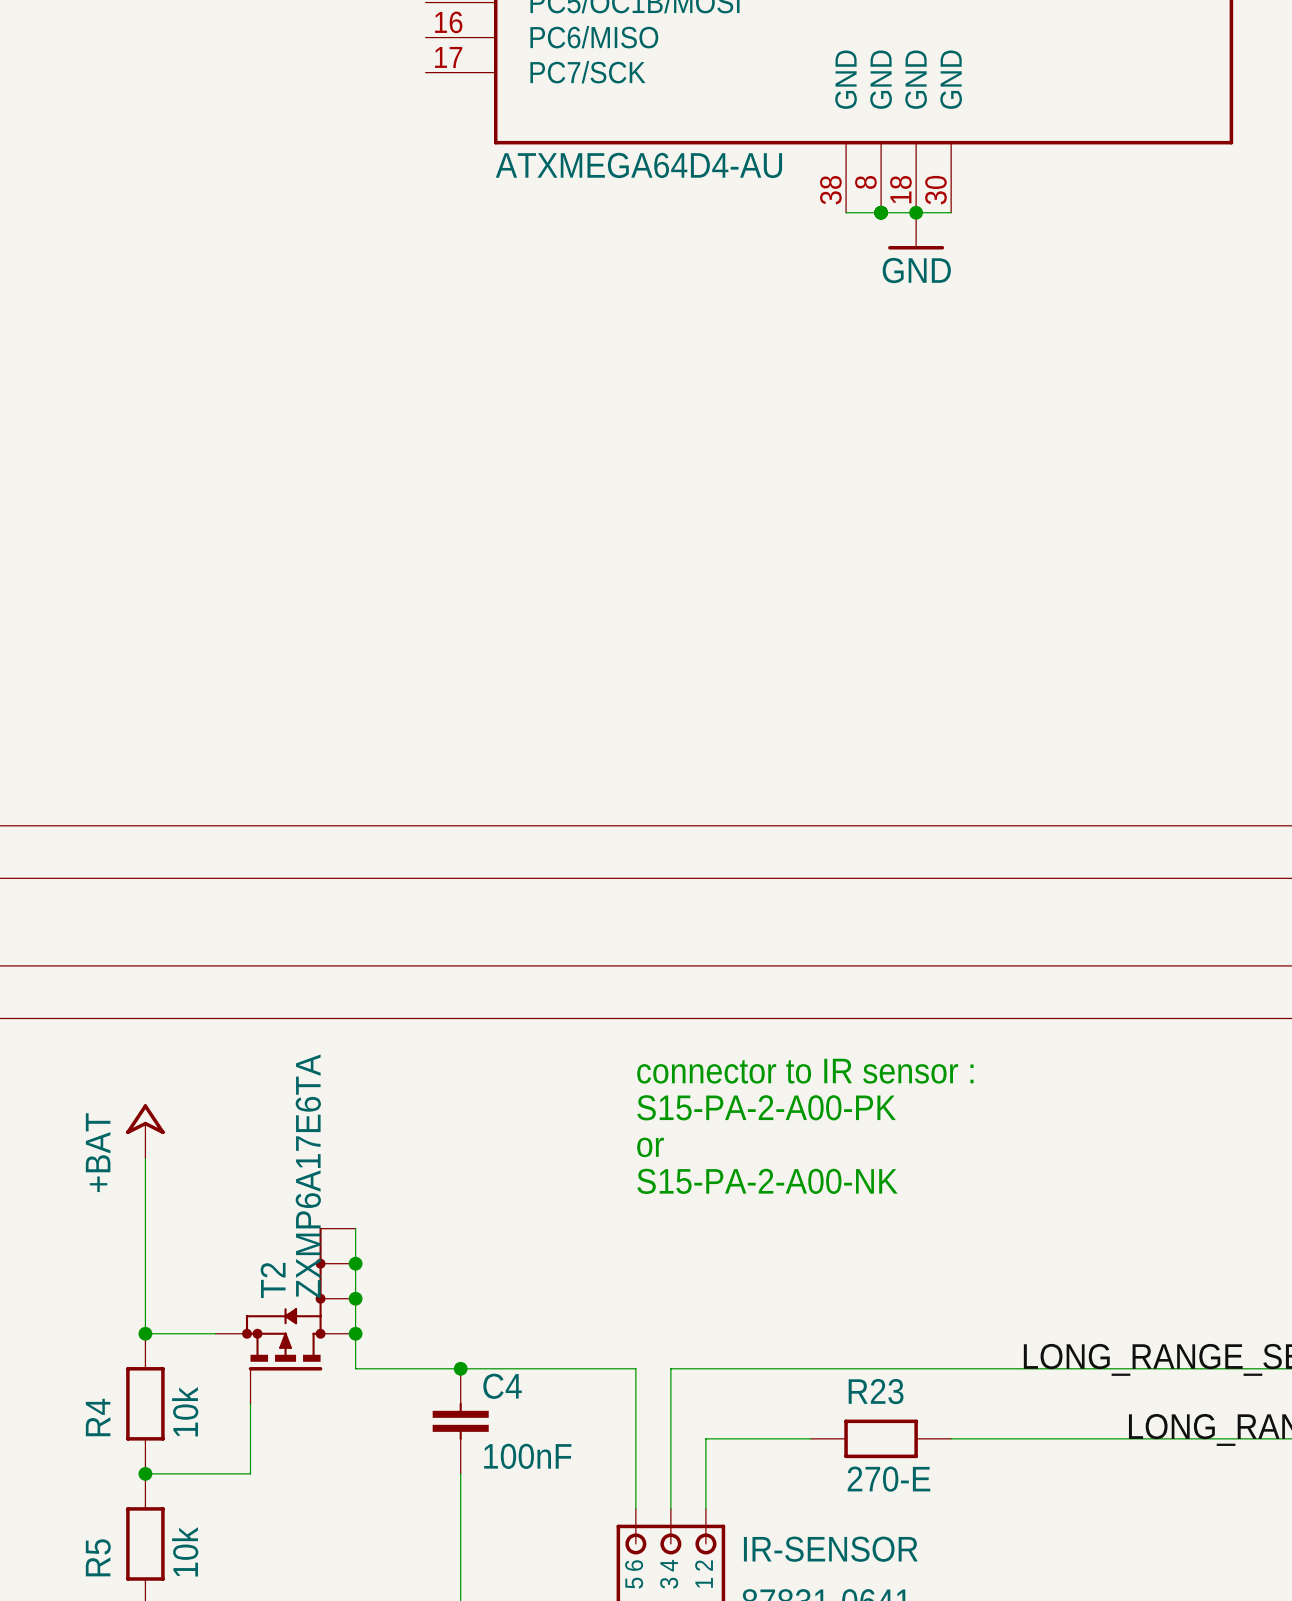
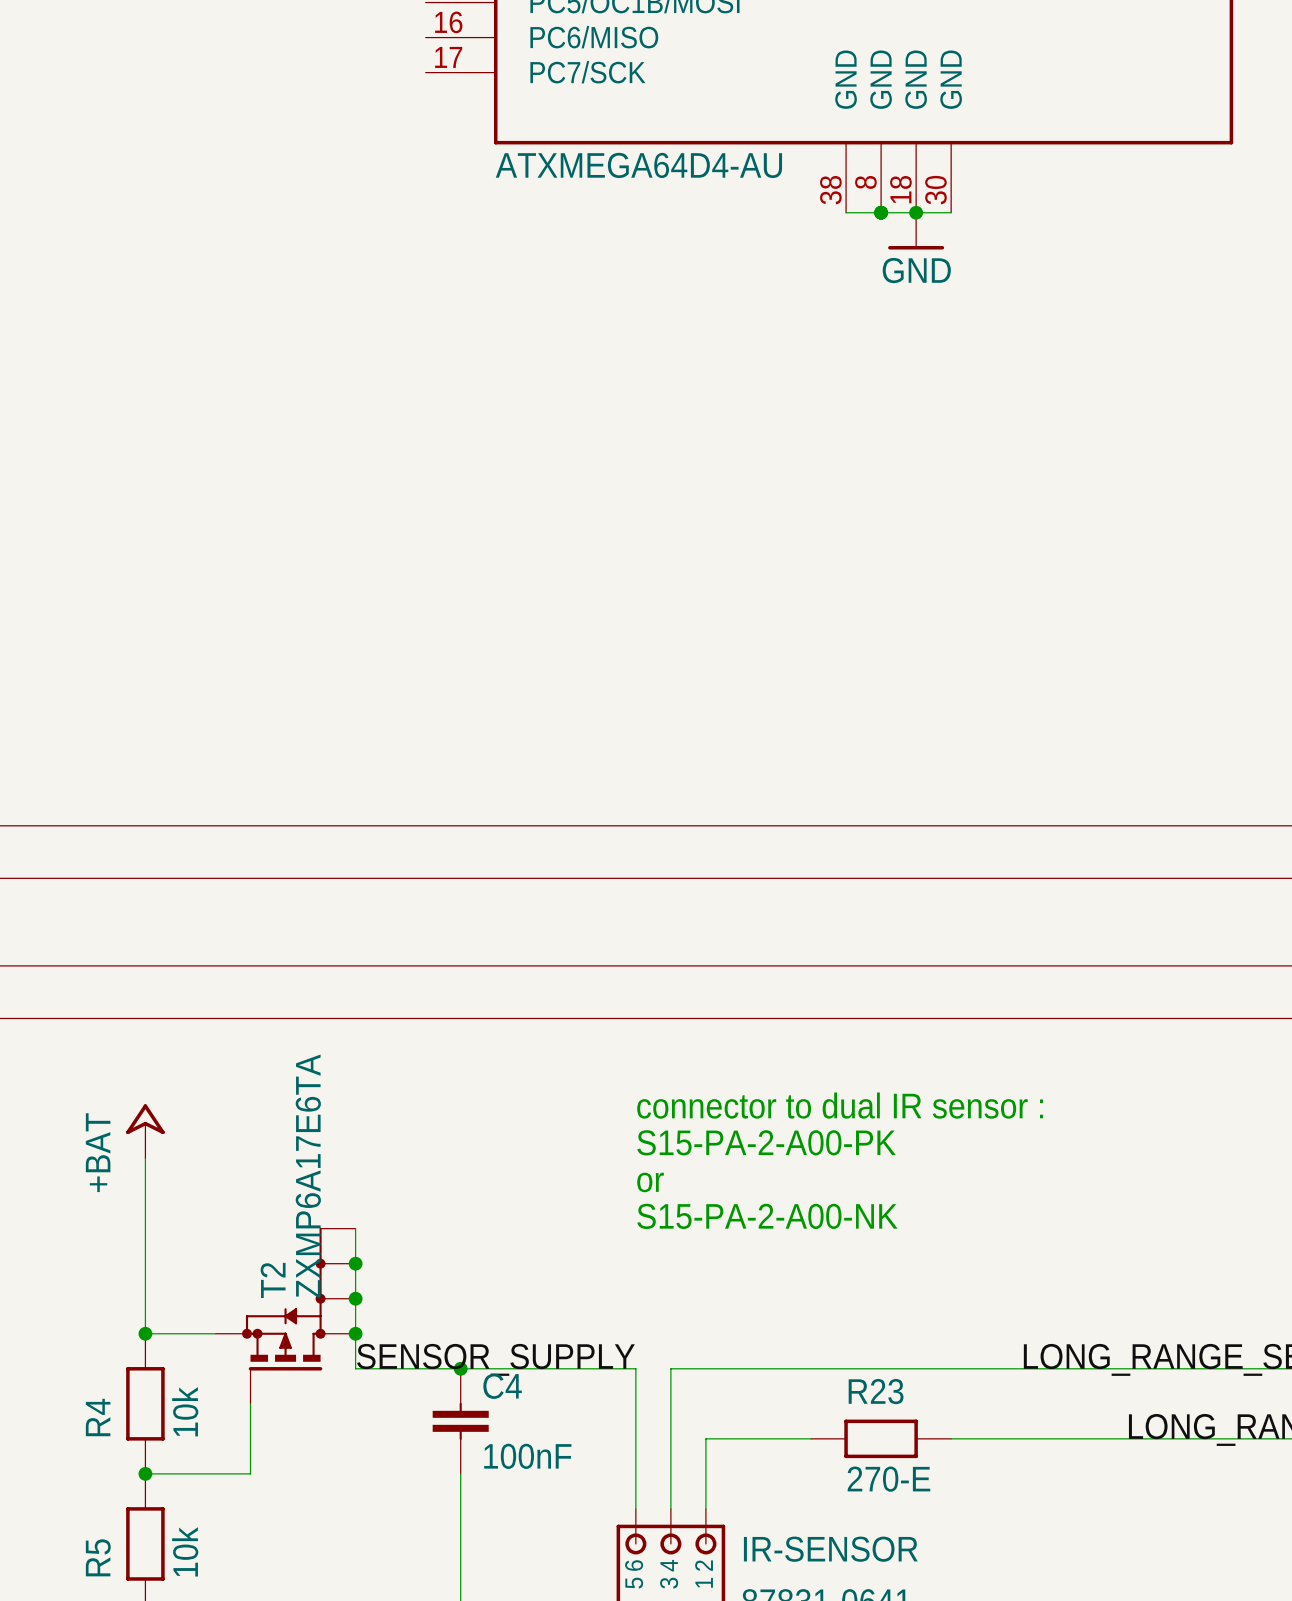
text: connector to IR sensor : (805, 1071) -> connector to dual IR sensor : (840, 1105)
text position: S15-PA-2-A00-PK (766, 1107) -> S15-PA-2-A00-PK (766, 1142)
text position: or (650, 1147) -> or (650, 1182)
text position: S15-PA-2-A00-NK (767, 1181) -> S15-PA-2-A00-NK (767, 1216)
label: none -> SENSOR_SUPPLY (495, 1359)

